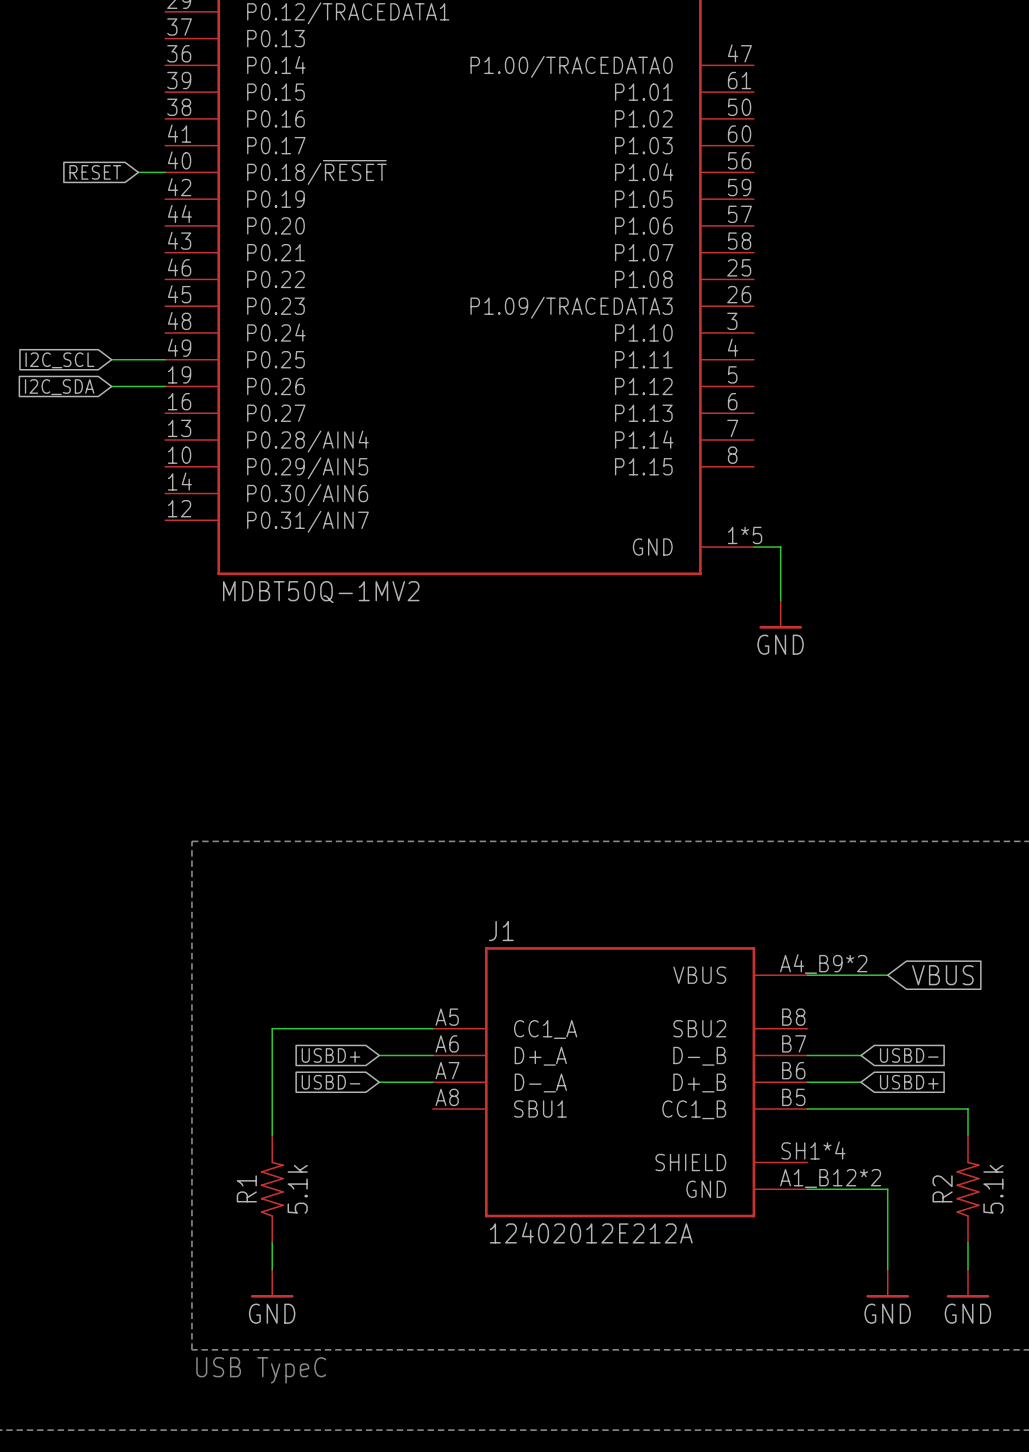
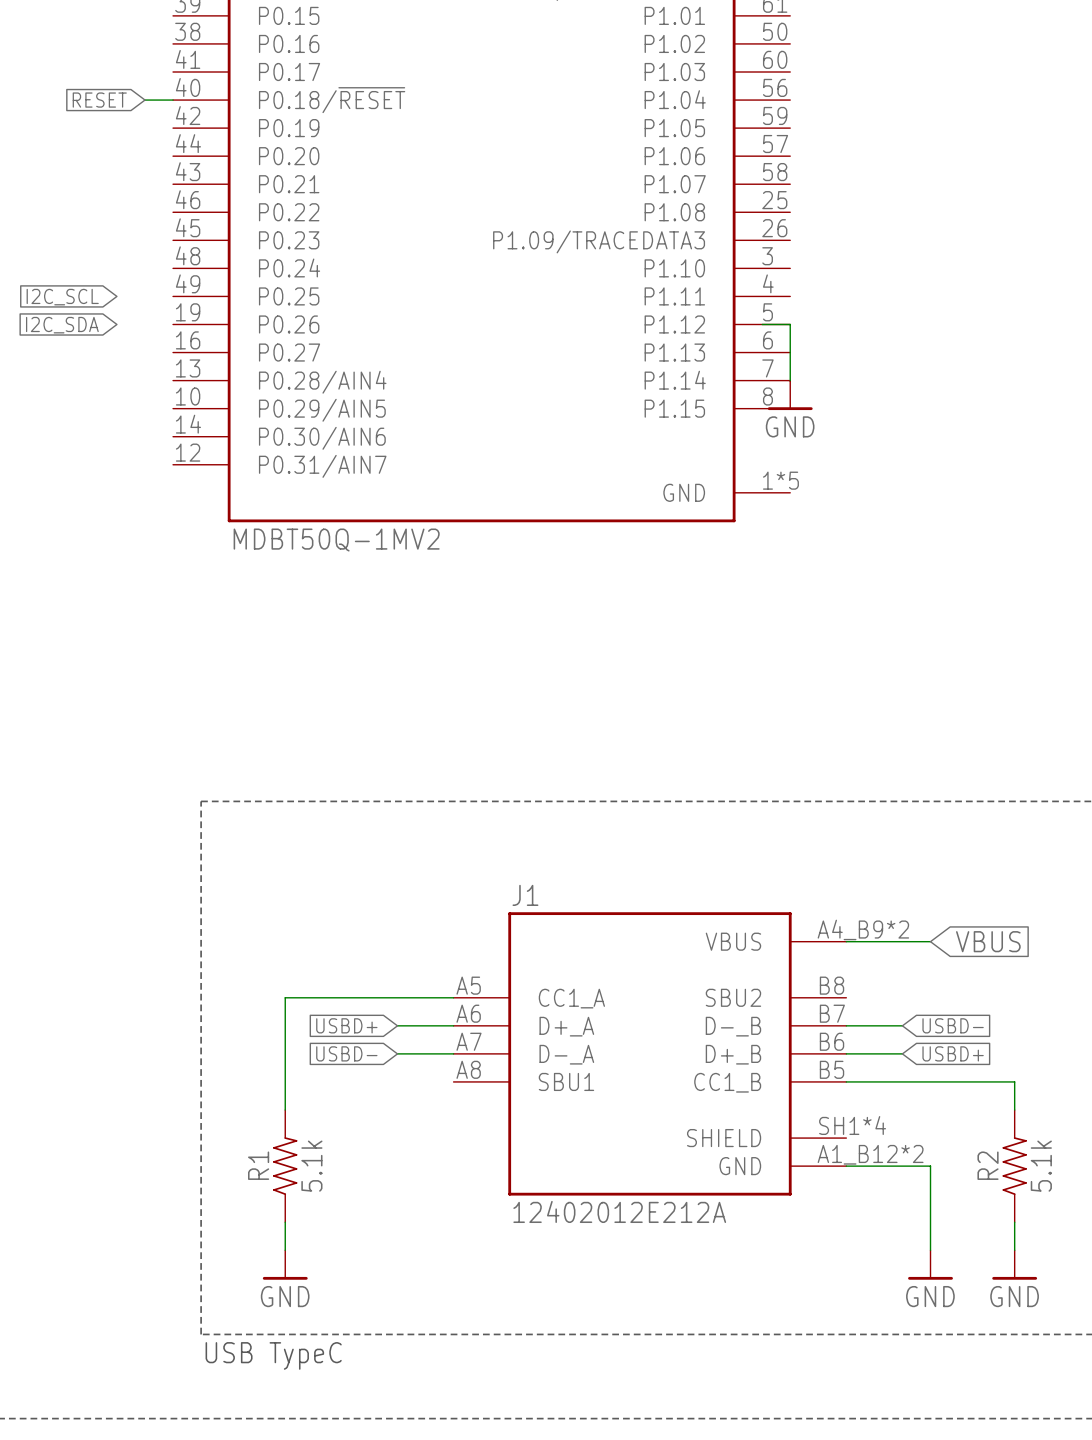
wire: (111, 359) (165, 359) -> none
wire: (111, 386) (165, 386) -> none
wire: (753, 547) (780, 547) (780, 600) -> (762, 324) (790, 324) (790, 380)
power symbol position: GND (780, 614) -> GND (790, 395)

